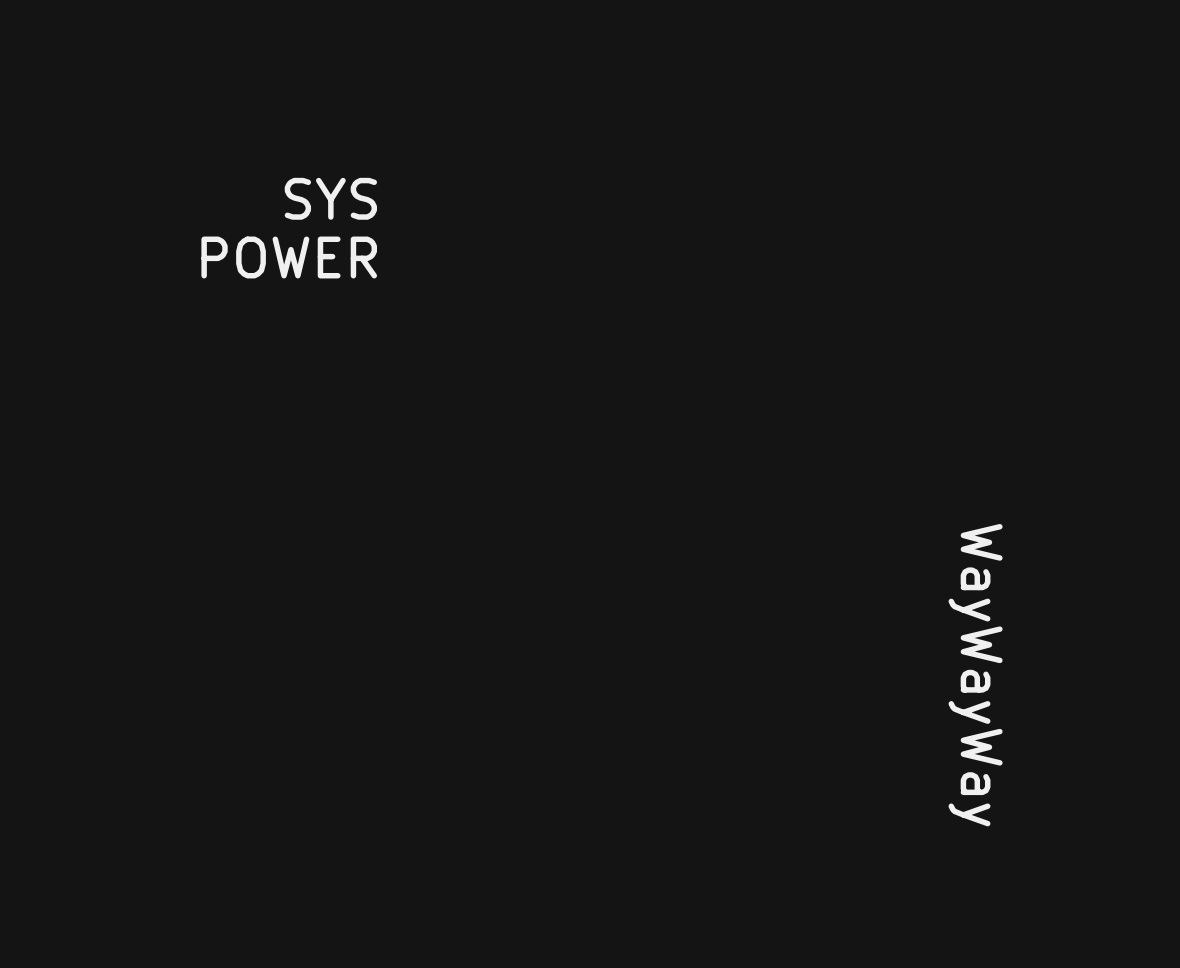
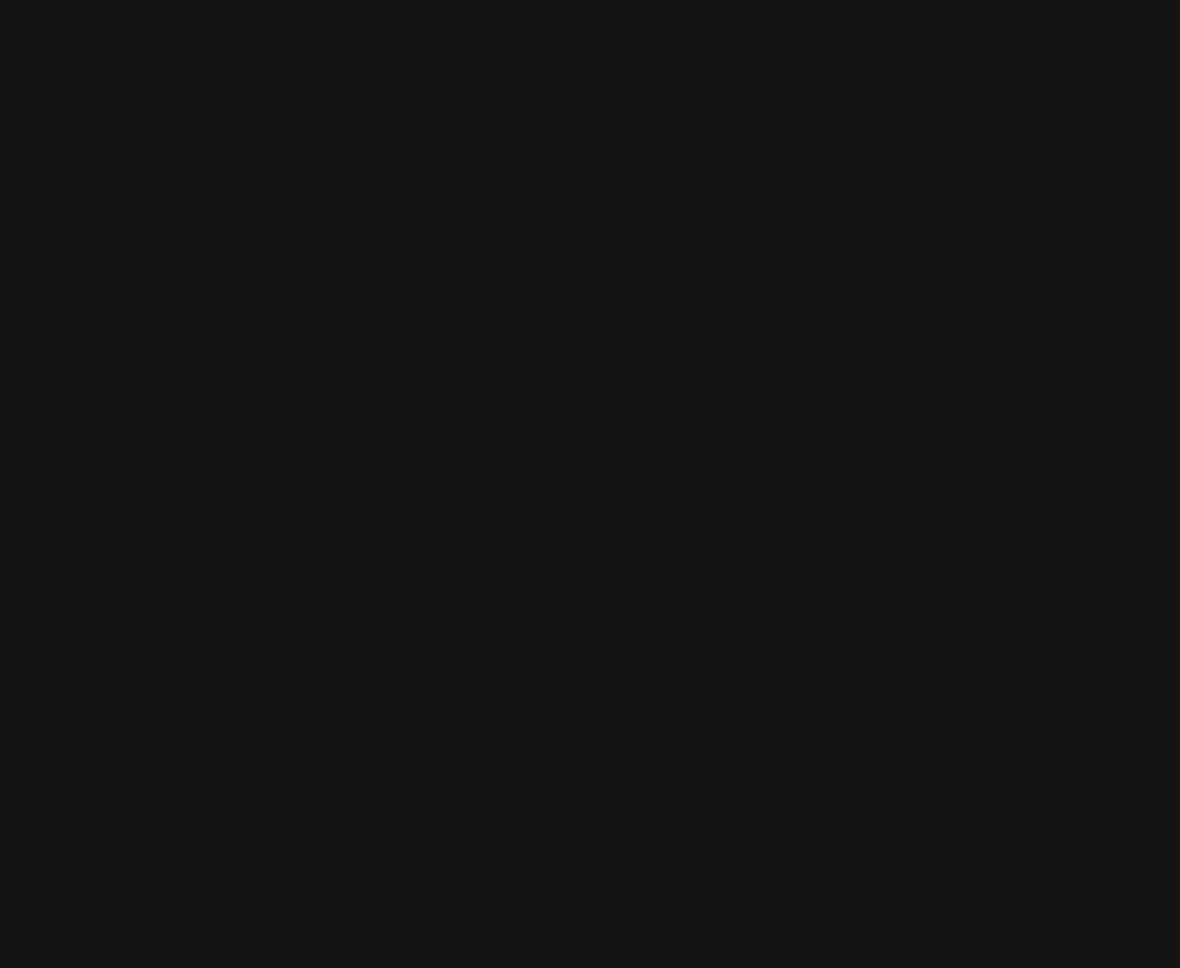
text: SYS (330, 198) -> none
text: POWER (289, 257) -> none
text: WayWayWay (975, 675) -> none

